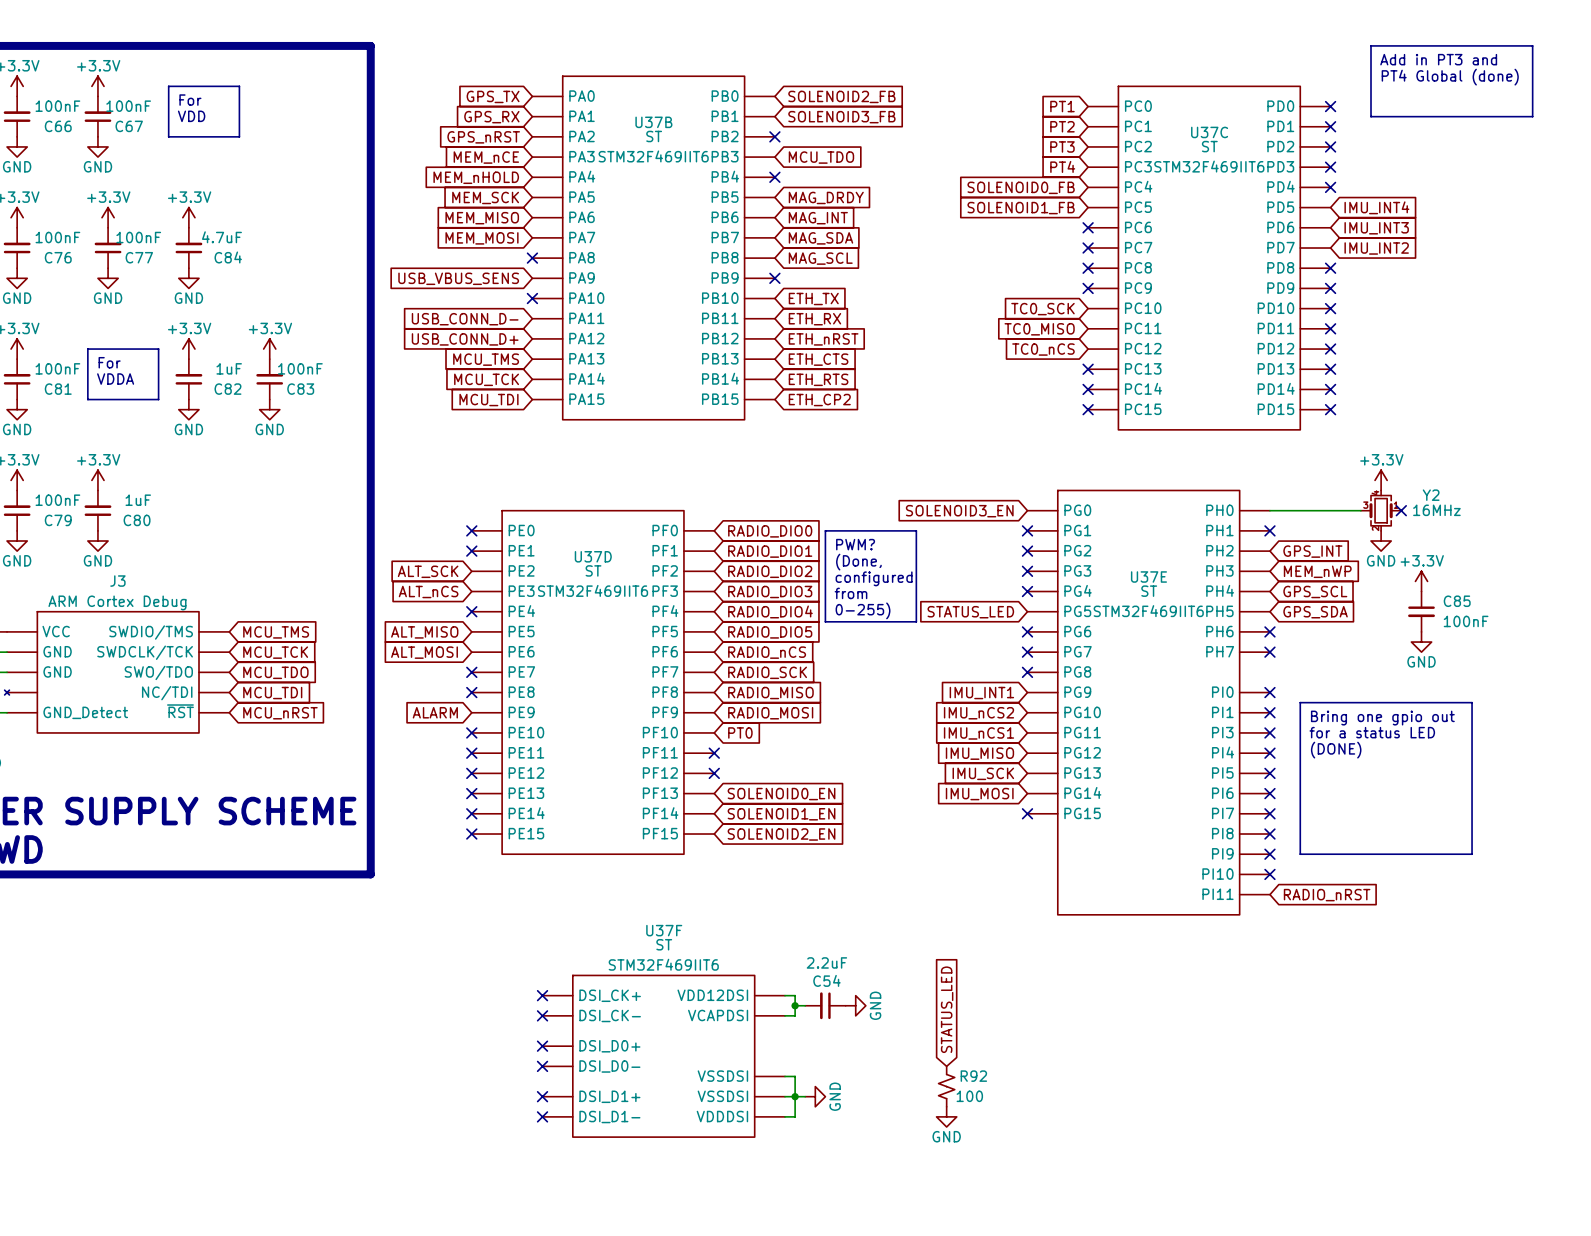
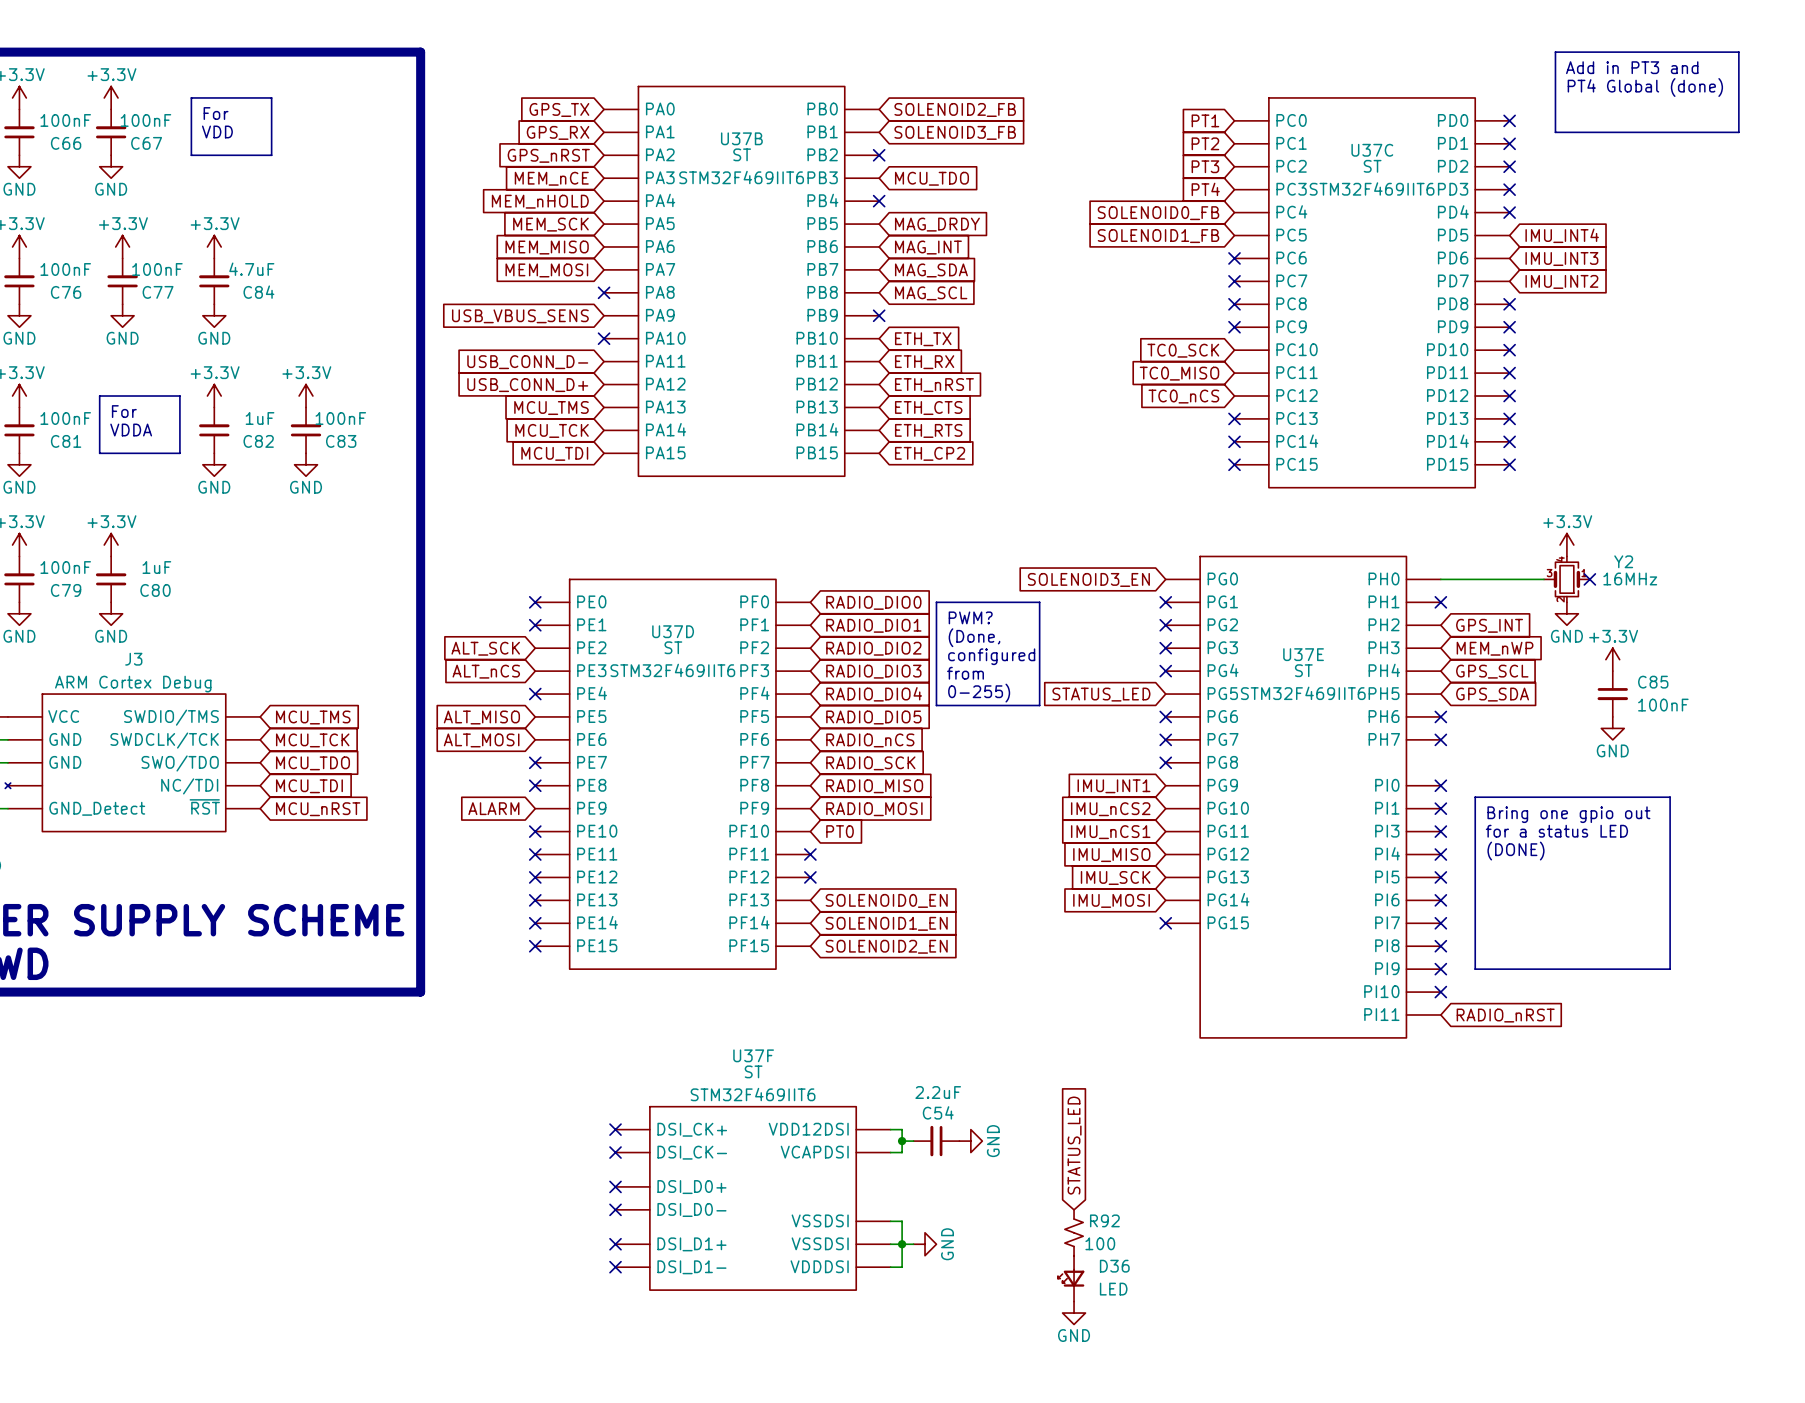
power symbol position: GND (946, 1116) -> GND (1074, 1313)
D36: none -> LED (1071, 1278)

